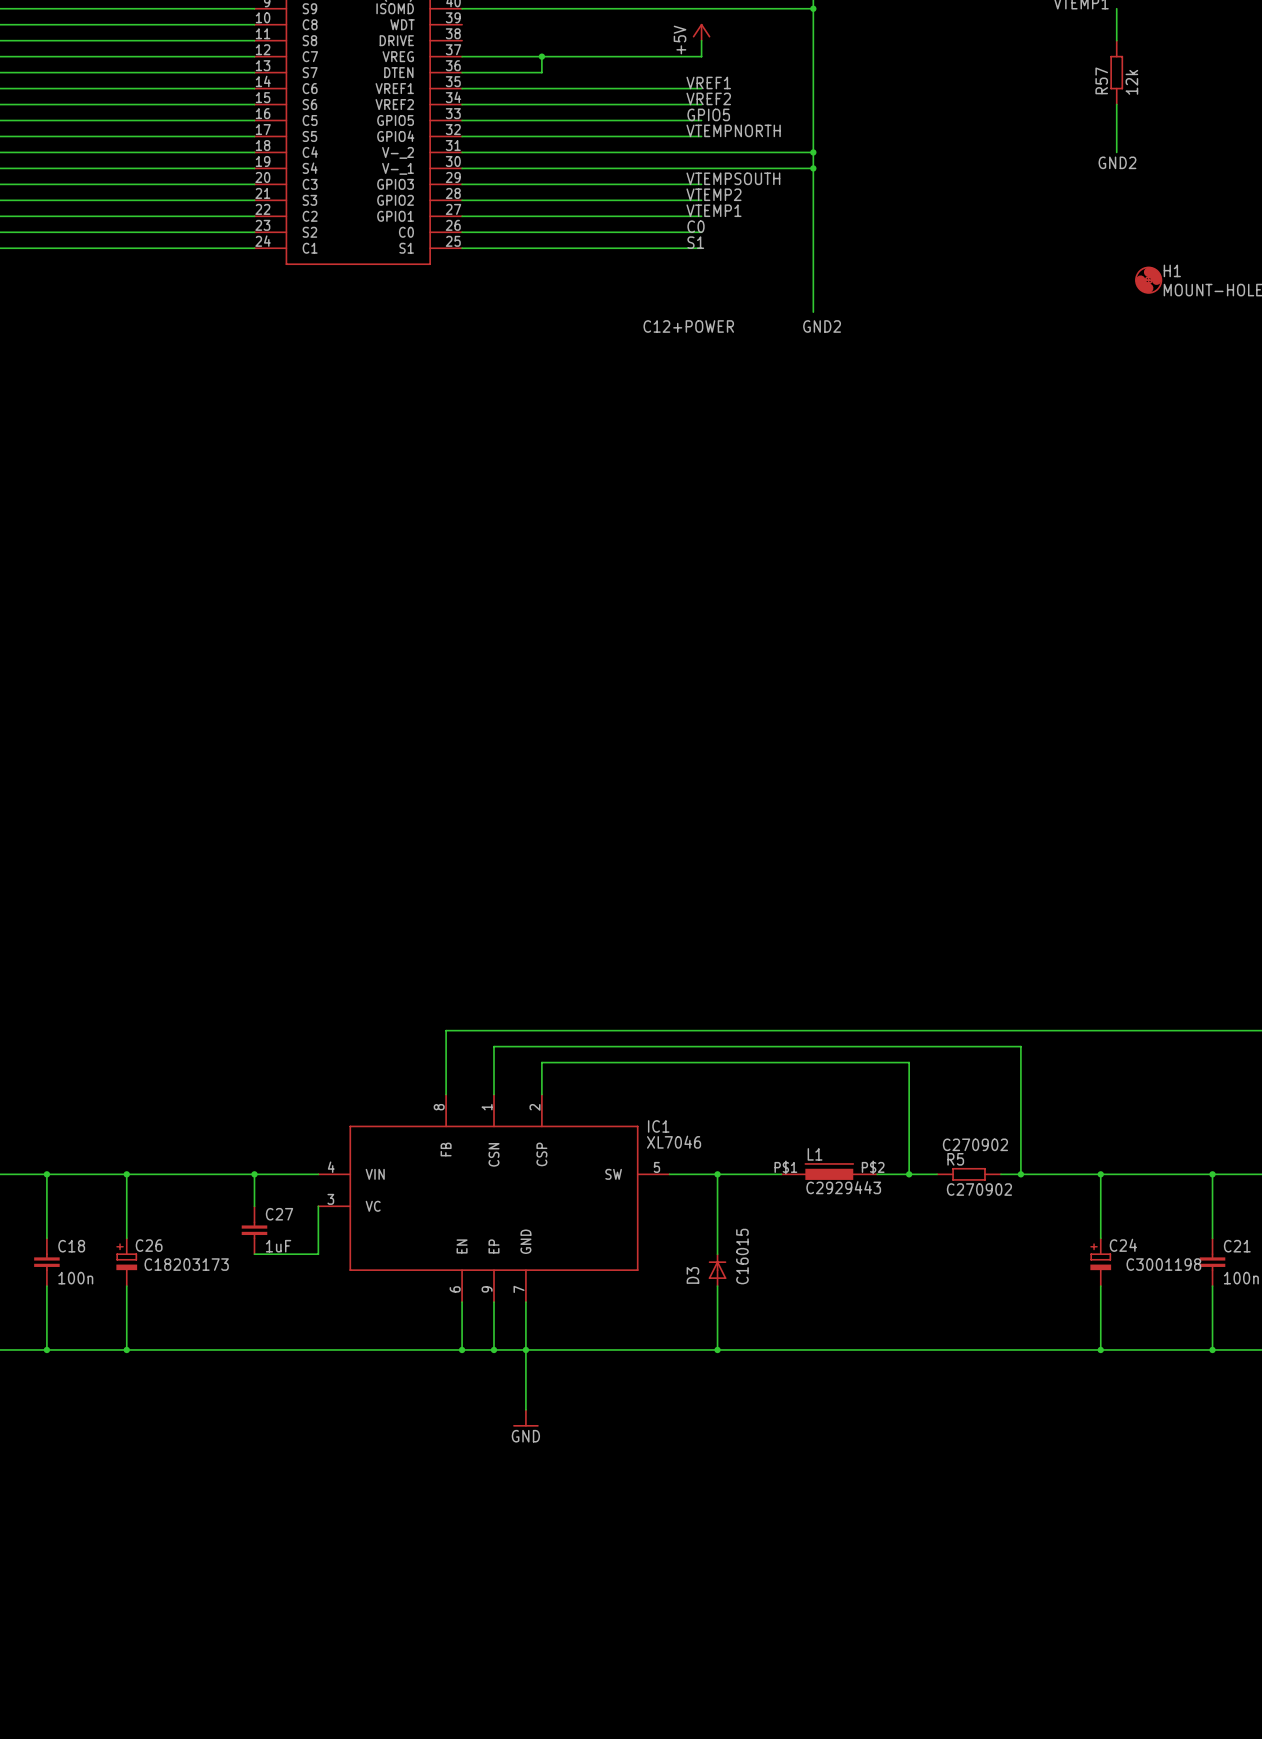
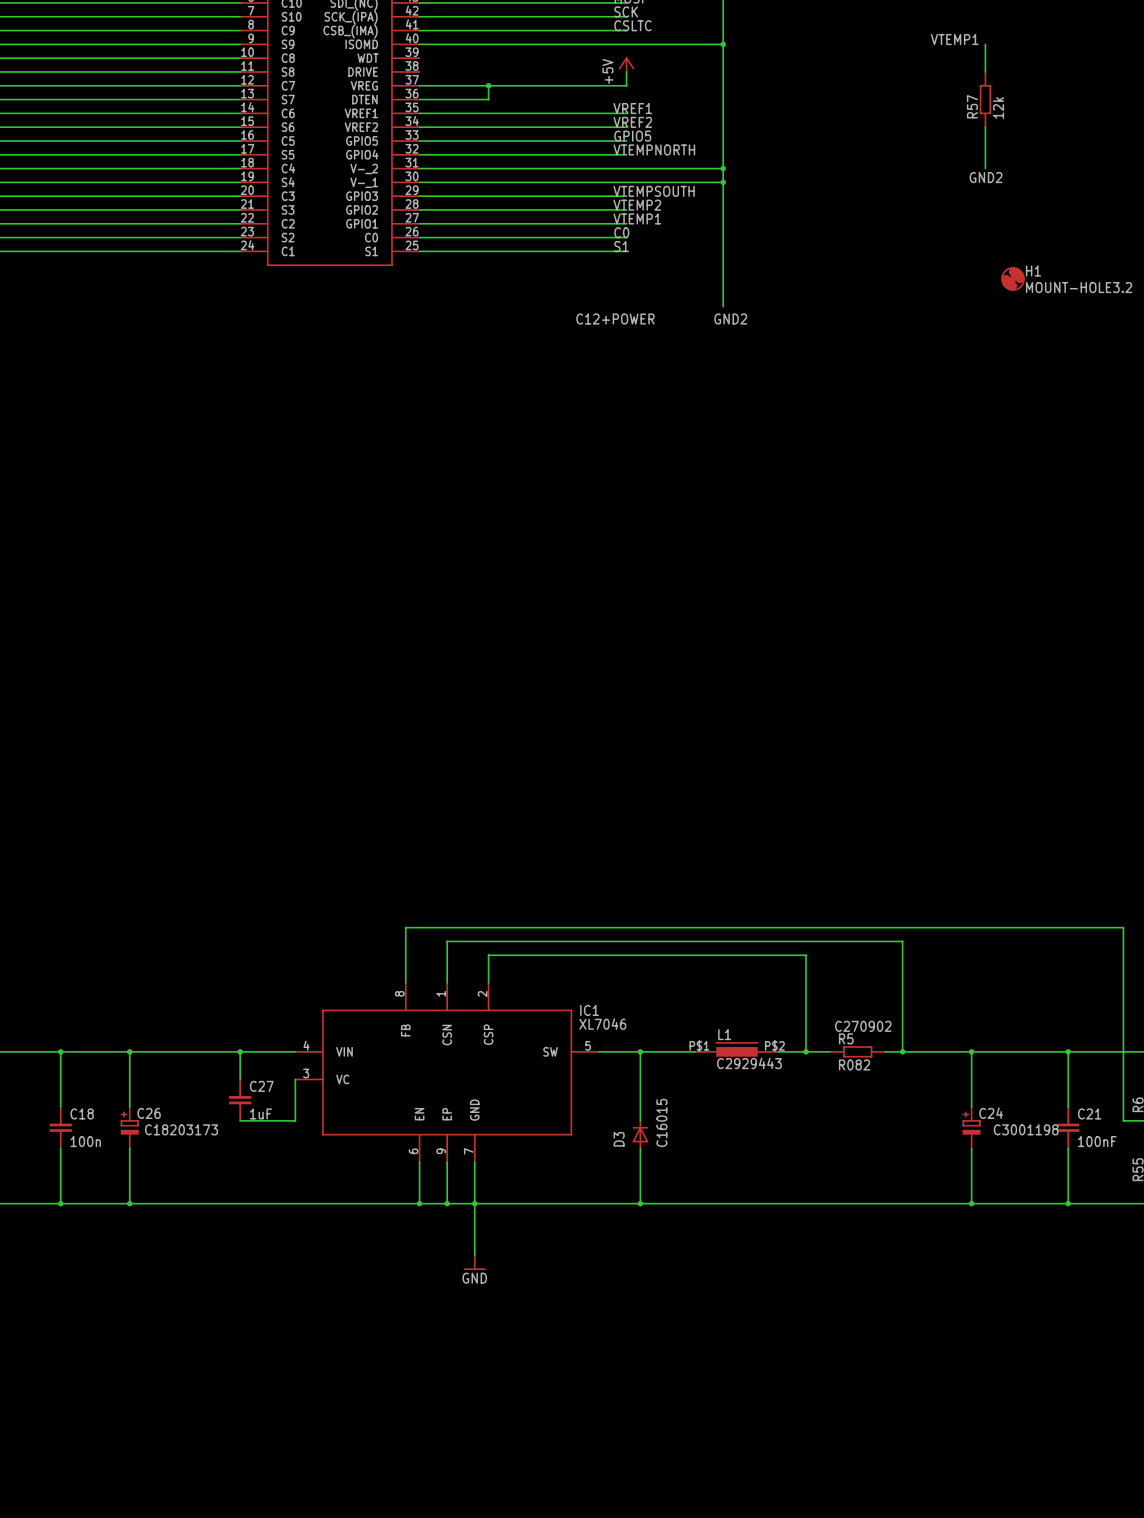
R5 value: C270902 (979, 1189) -> R082 (854, 1064)

